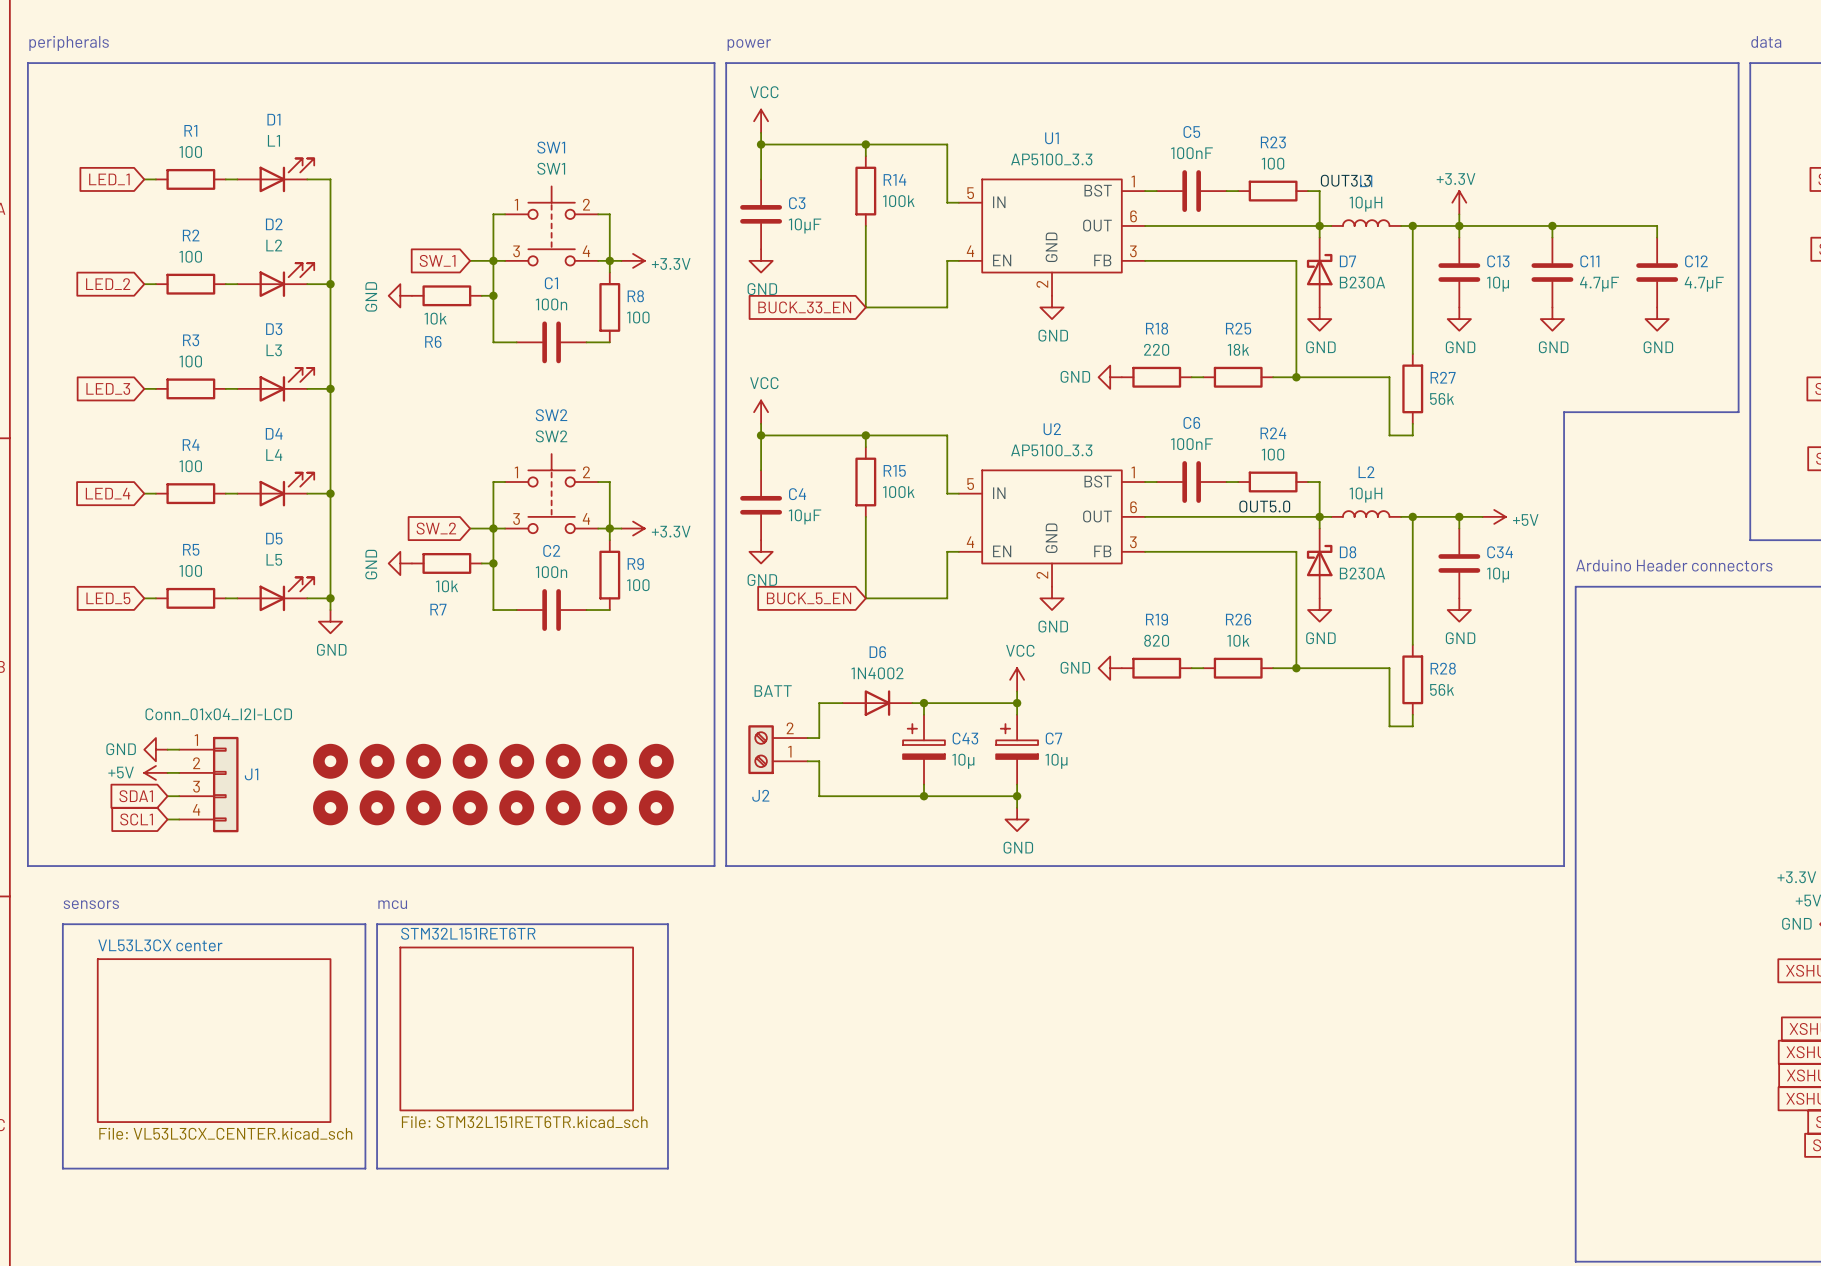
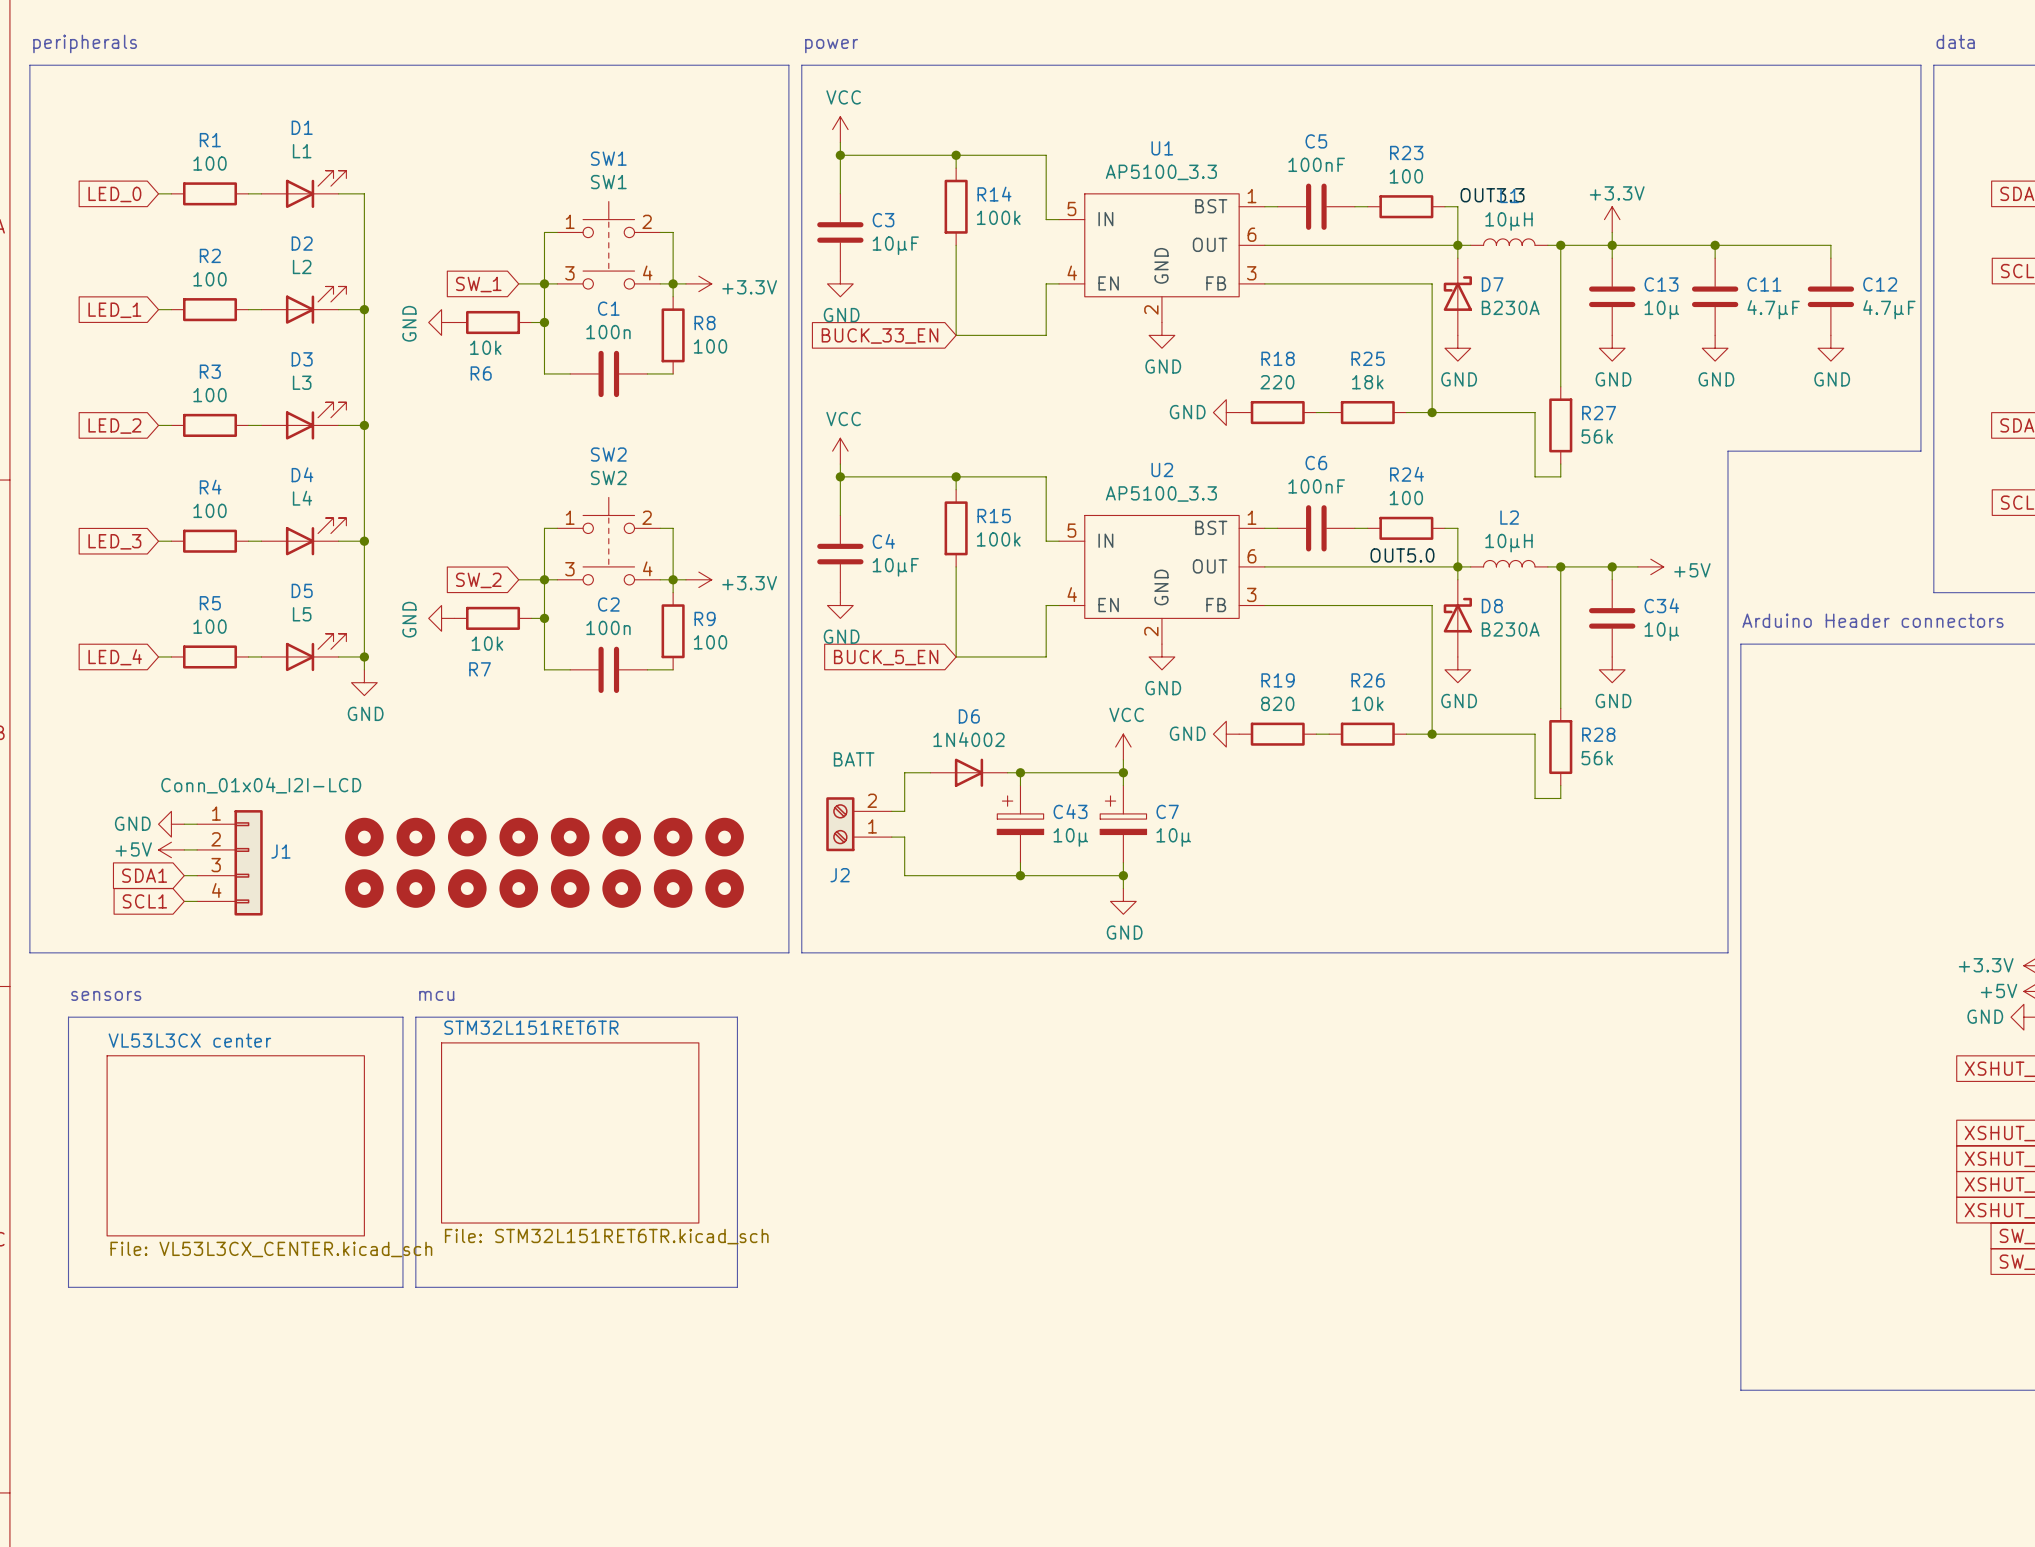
global label: LED_1 (109, 179) -> LED_0 (114, 194)
global label: LED_2 (108, 284) -> LED_1 (114, 310)
global label: LED_3 (108, 388) -> LED_2 (114, 426)
global label: LED_4 (108, 493) -> LED_3 (114, 541)
global label: LED_5 (108, 598) -> LED_4 (115, 657)

